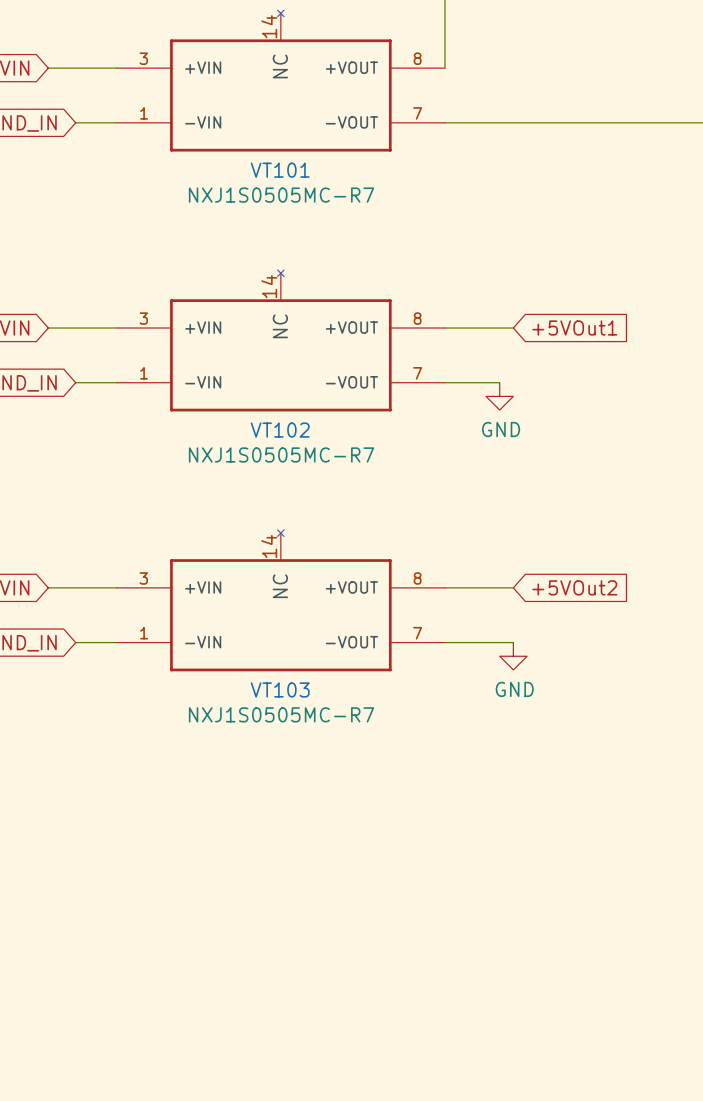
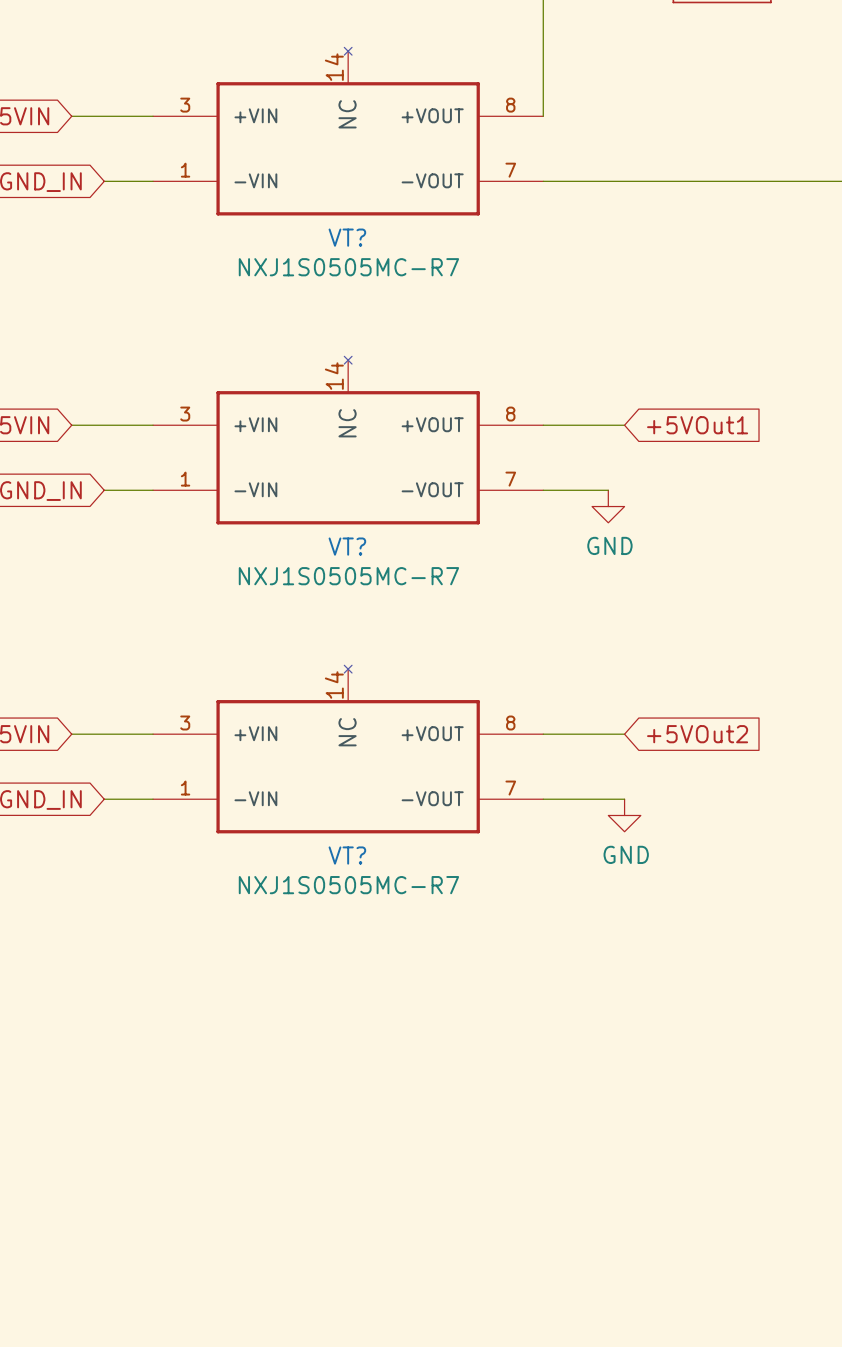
VT101 name: VT101 (280, 170) -> VT? (347, 237)
VT102 name: VT102 (280, 430) -> VT? (347, 546)
VT103 name: VT103 (280, 689) -> VT? (347, 855)

